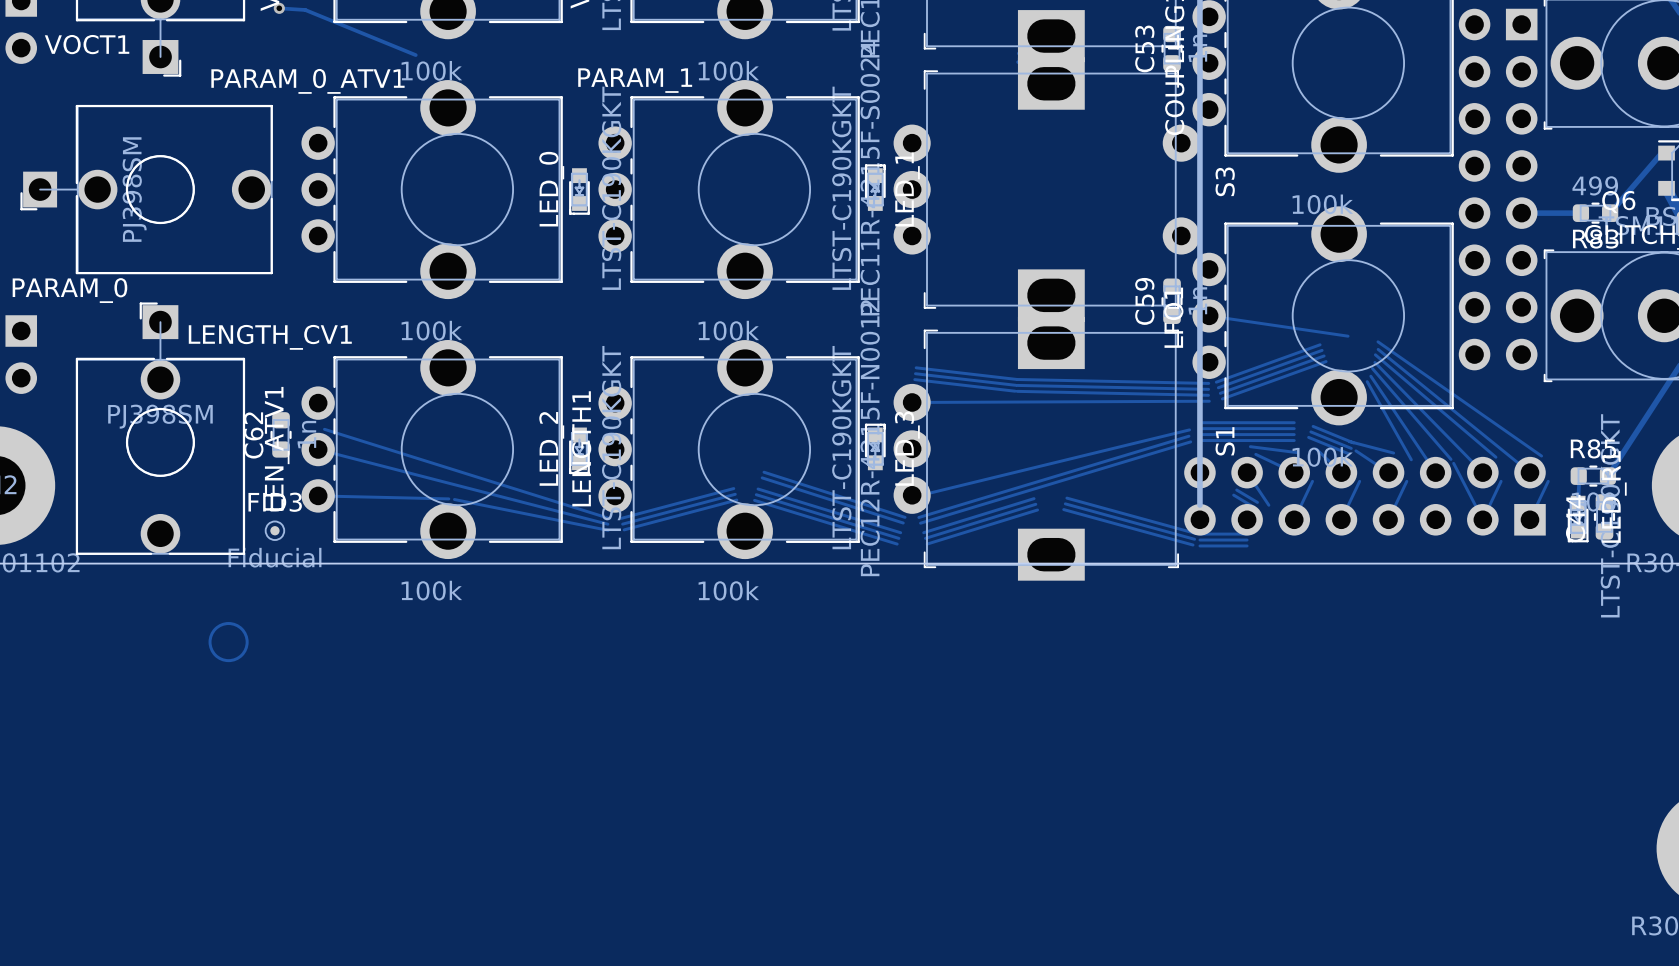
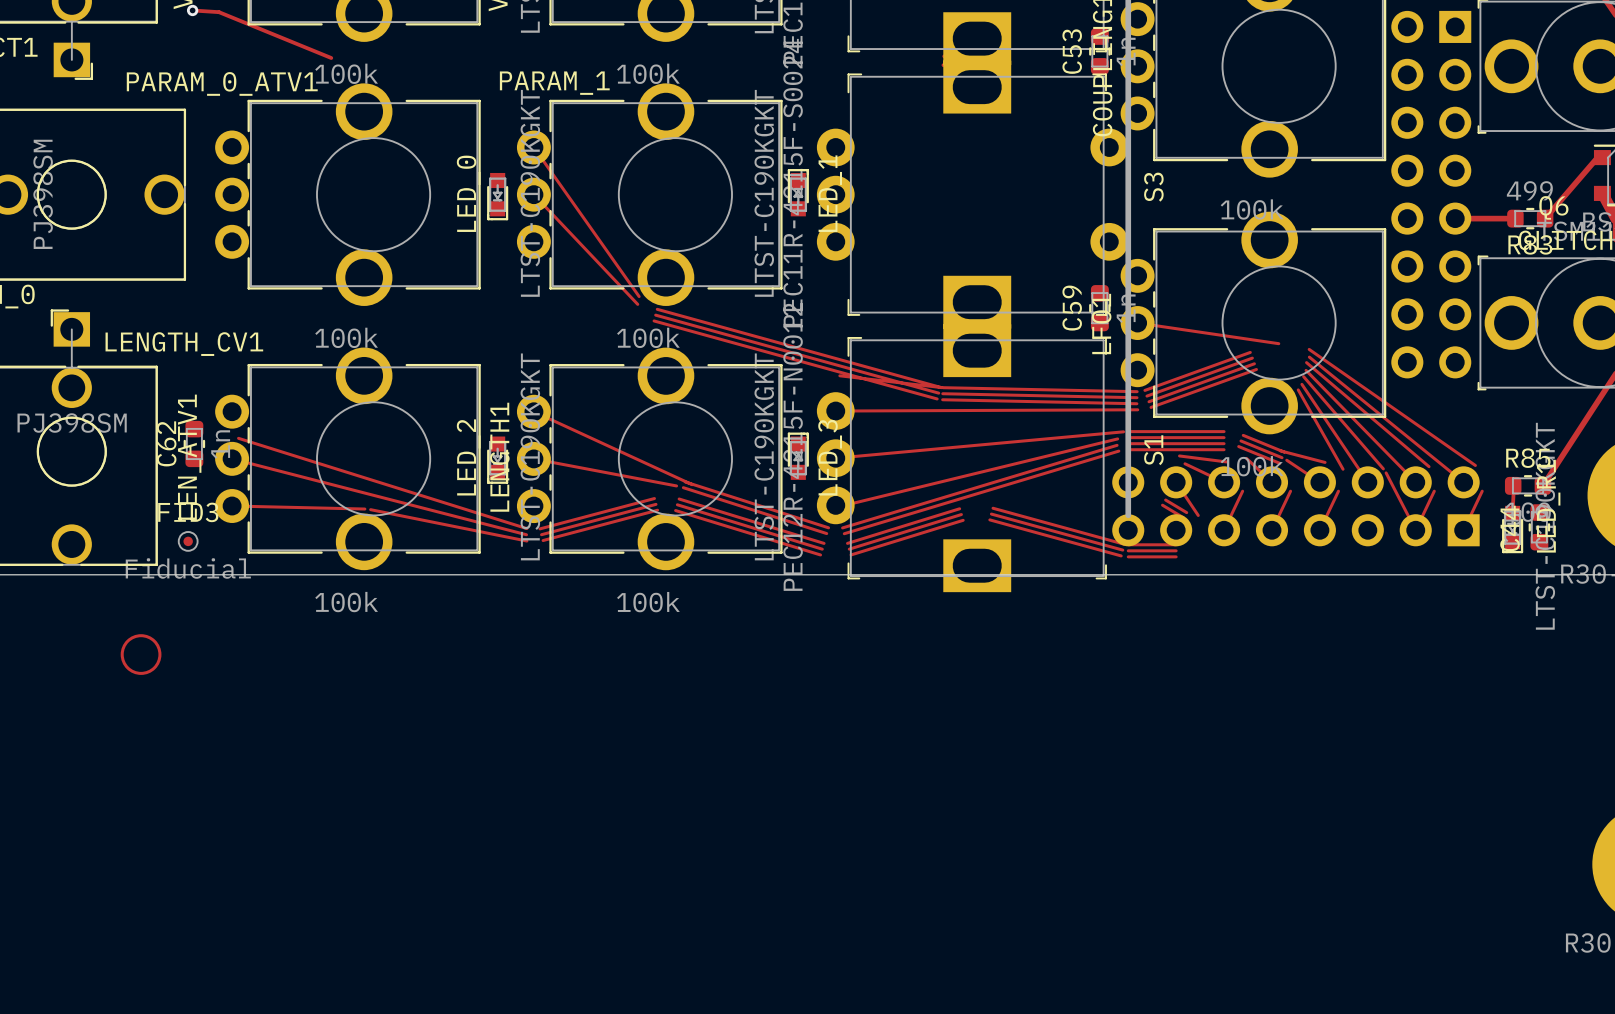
track: none -> (533, 147) (639, 296)
track: none -> (533, 194) (637, 304)
track: none -> (657, 309) (940, 387)
track: none -> (655, 315) (938, 393)
track: none -> (654, 320) (937, 398)
track: (915, 373) (1015, 385) -> none
track: (914, 379) (1015, 391) -> none
track: none -> (533, 411) (692, 484)
track: none -> (1123, 431) (835, 458)
track: none -> (533, 458) (676, 485)

